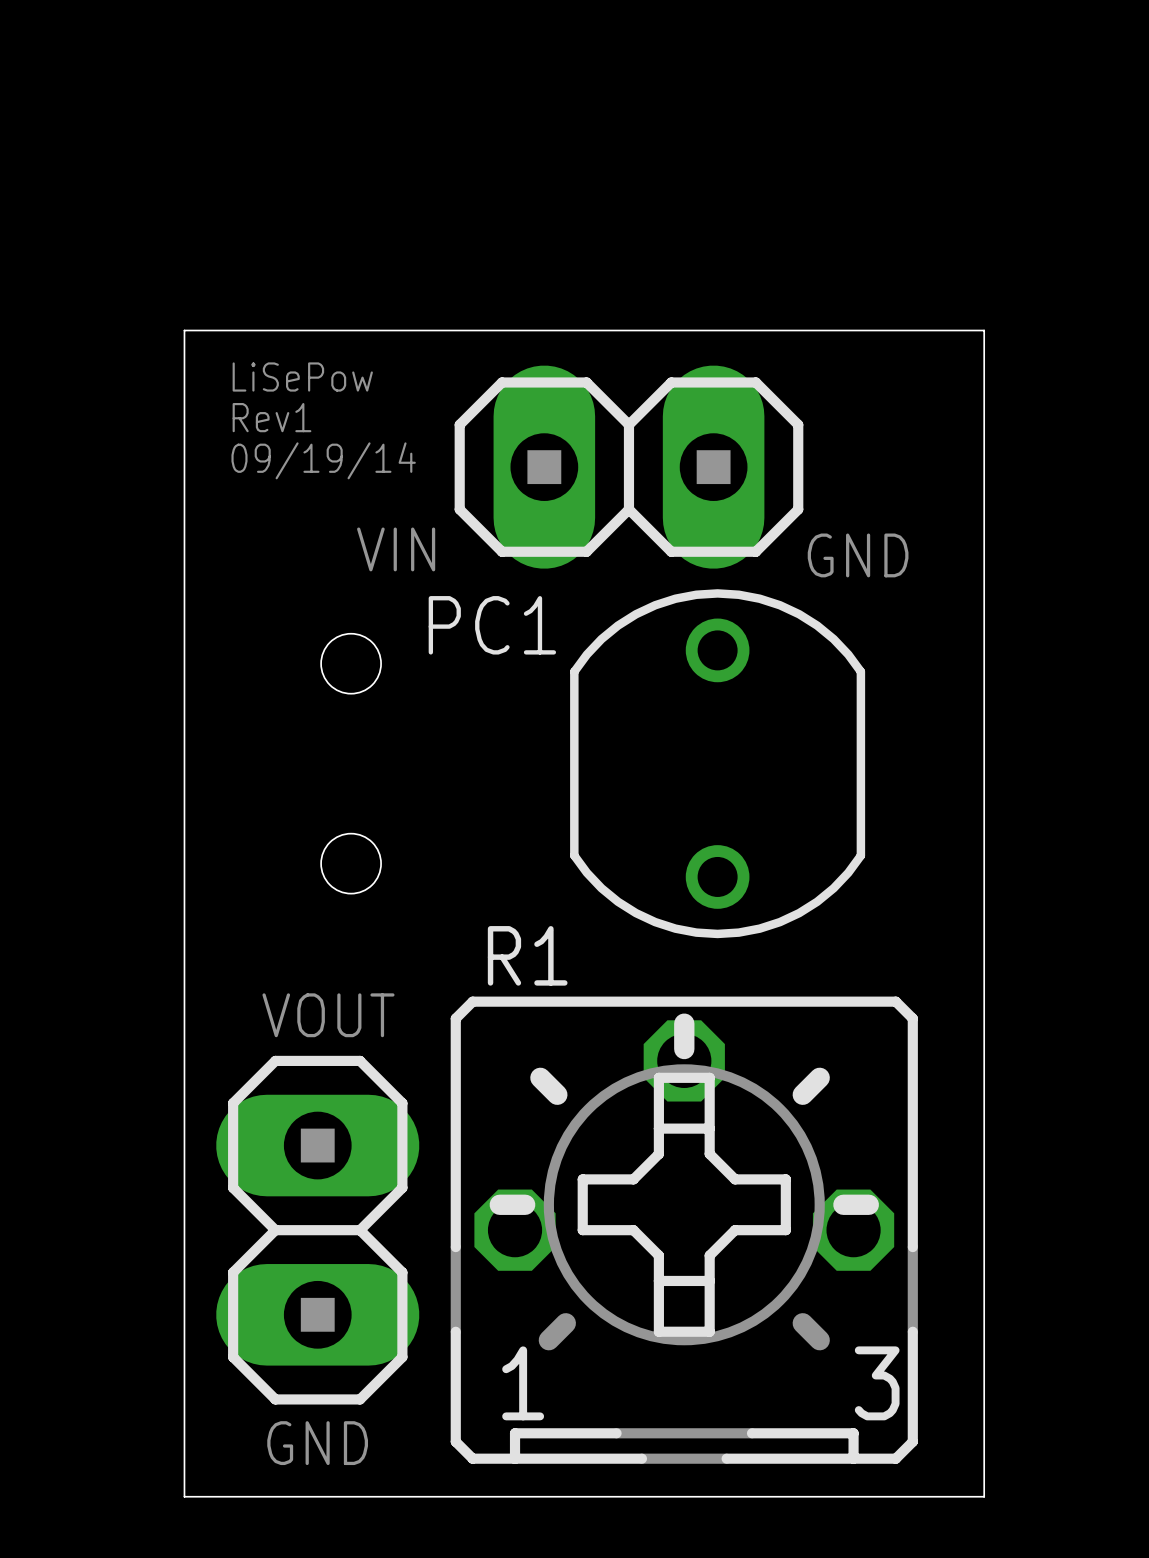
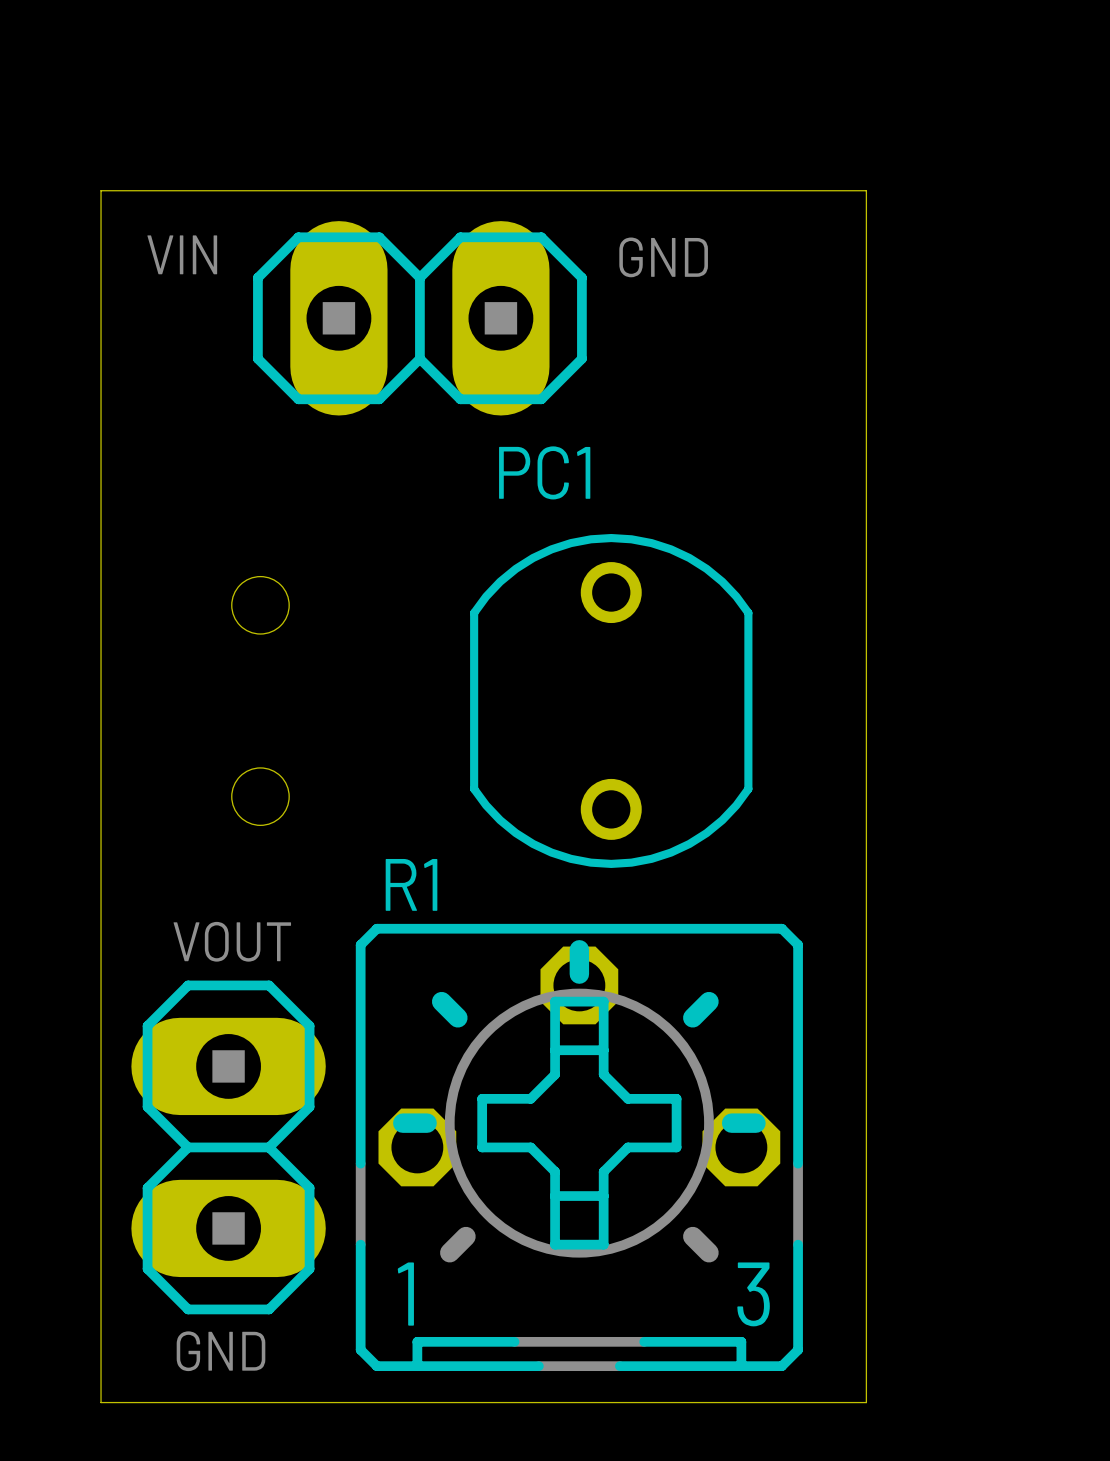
board edge: (184, 330) (984, 330) -> (101, 286) (101, 190) (866, 190) (866, 286)
text: LiSePow (302, 377) -> none
text: Rev1 (271, 417) -> none
text: 09/19/14 (323, 460) -> none
part position: (628, 467) -> (419, 318)
text position: VIN (396, 549) -> VIN (182, 254)
text position: GND (858, 555) -> GND (663, 257)
PC1 name position: PC1 (492, 625) -> PC1 (544, 472)

